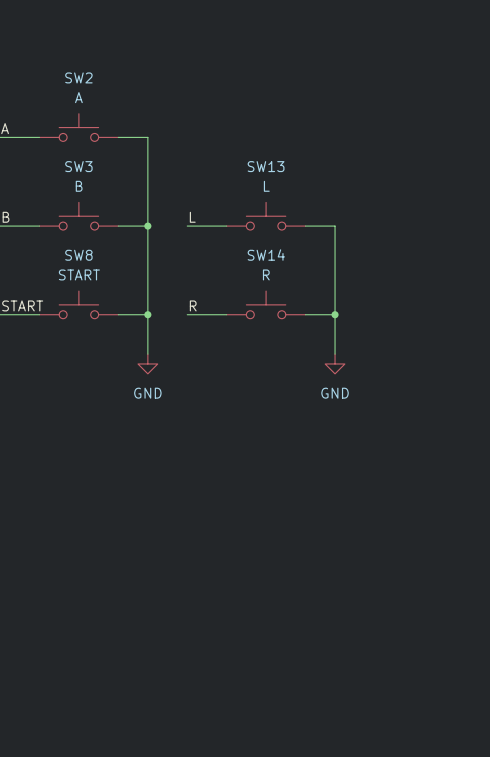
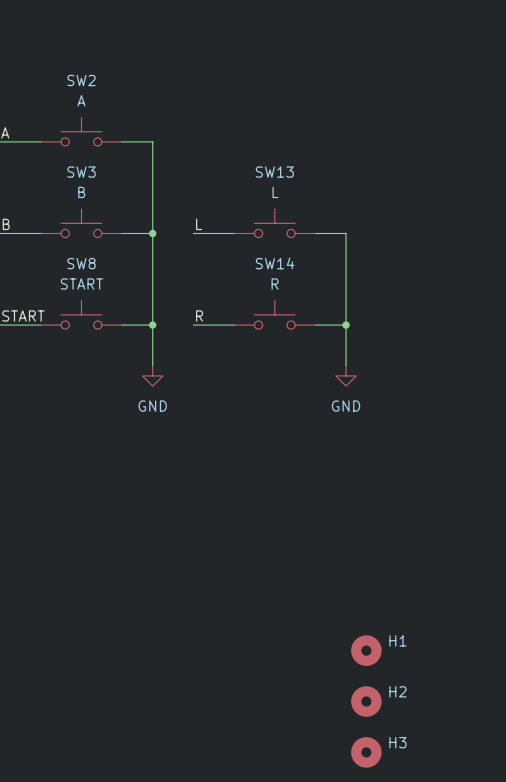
H1: none -> (366, 650)
H2: none -> (366, 701)
H3: none -> (366, 752)

